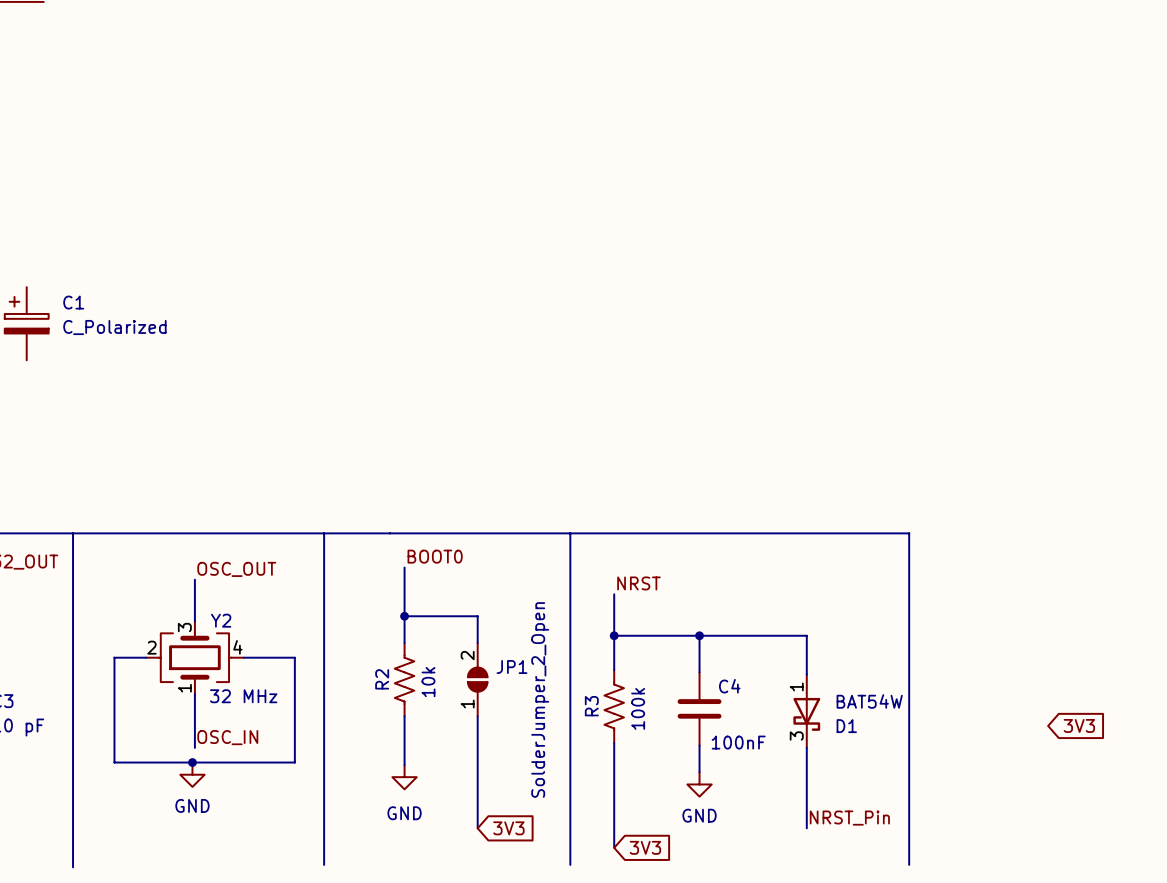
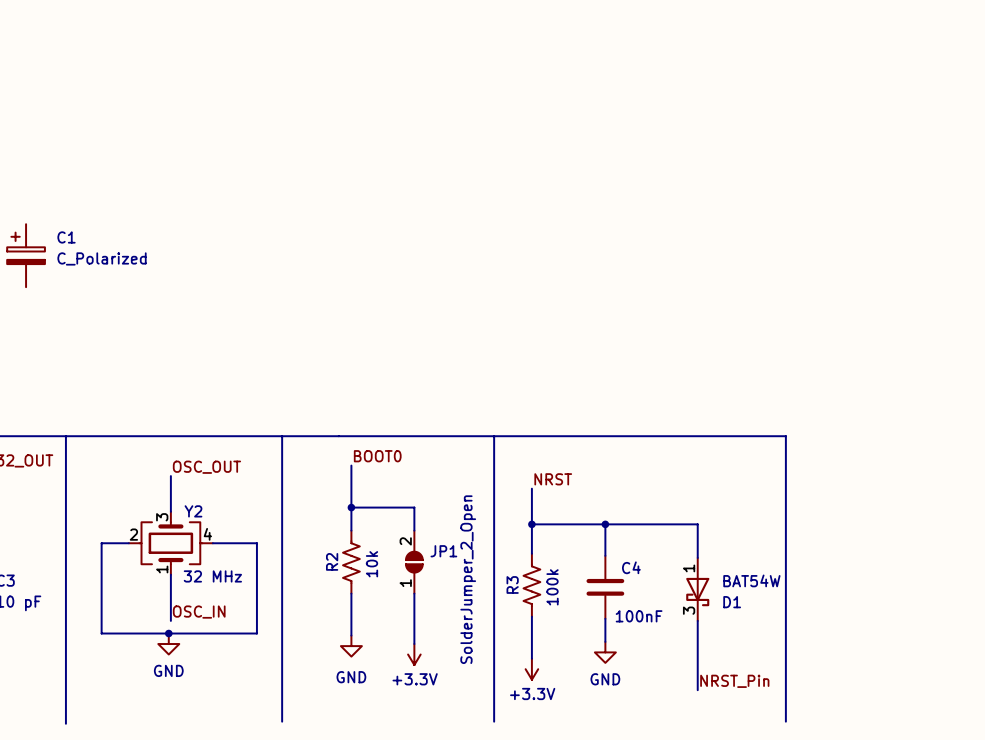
global label: 3V3 (1079, 725) -> none
wire: (477, 774) (477, 828) -> none
power symbol: none -> +3.3V (414, 654)
wire: (614, 791) (614, 847) -> none
power symbol: none -> +3.3V (531, 669)
global label: 3V3 (508, 828) -> none
global label: 3V3 (645, 847) -> none

